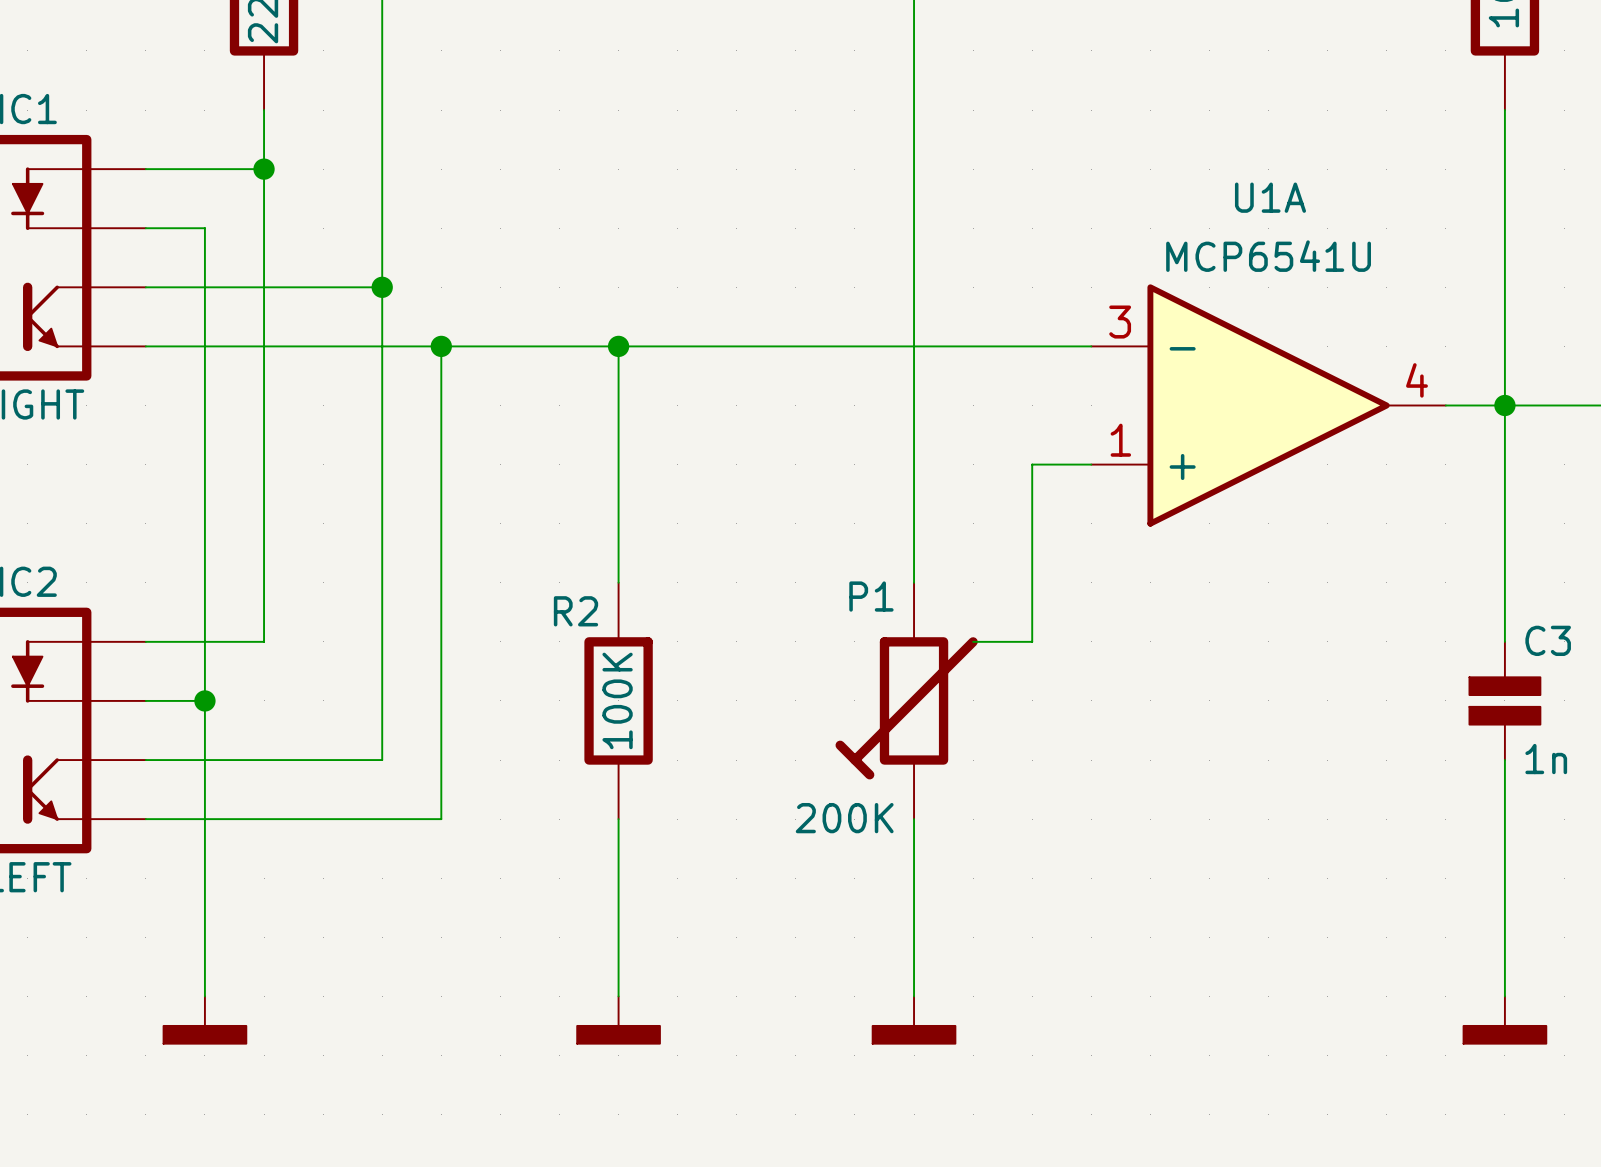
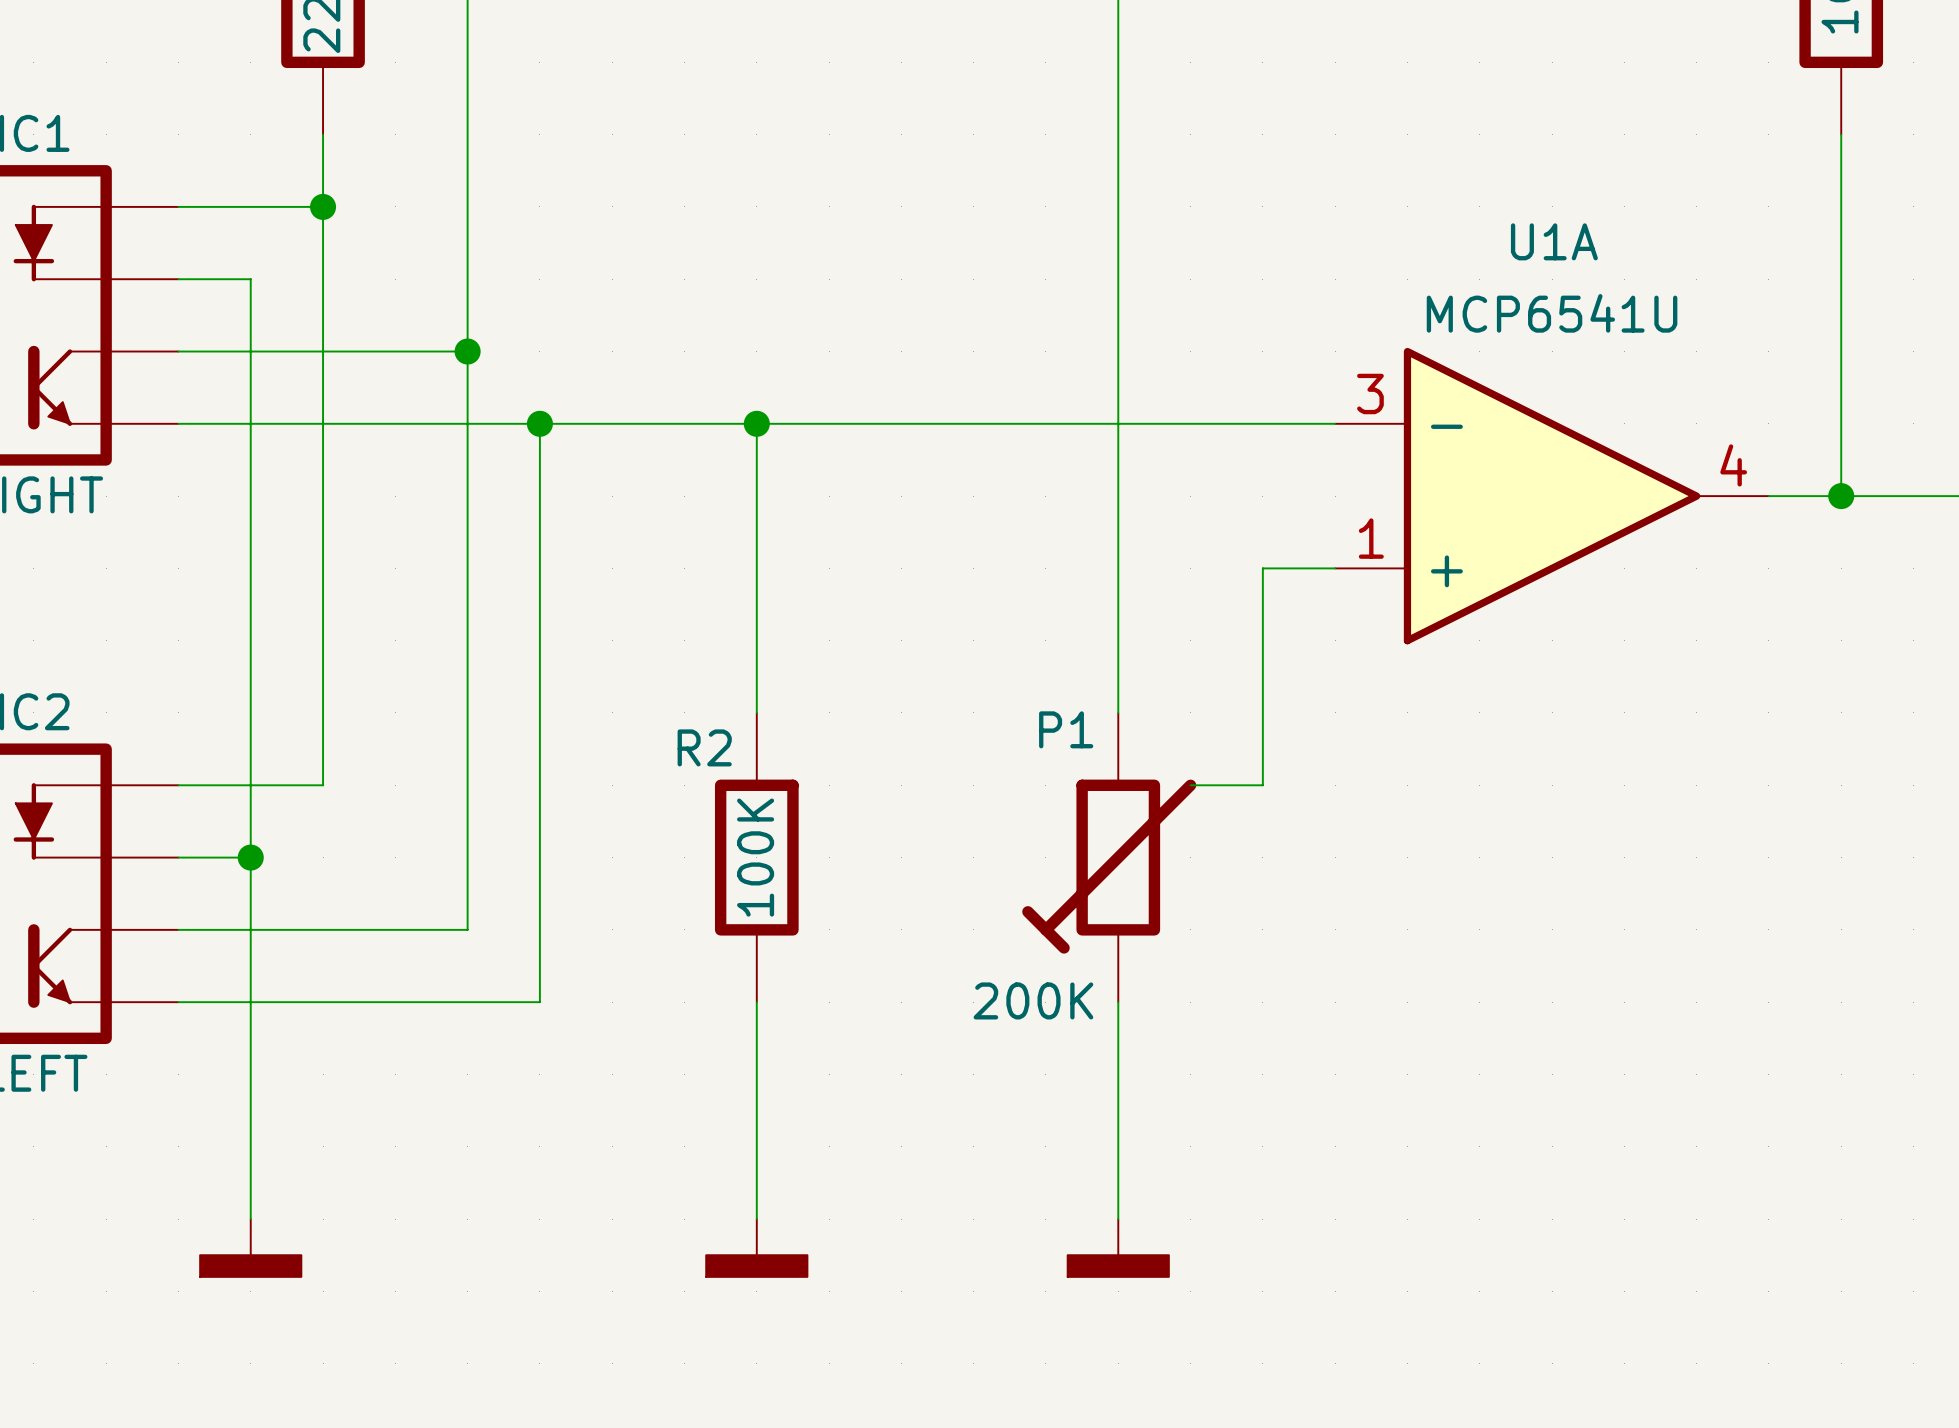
wire: (1504, 405) (1504, 641) -> none
C3: 1n (1504, 700) -> none
wire: (1504, 760) (1504, 996) -> none
power symbol: (1504, 1020) -> none

